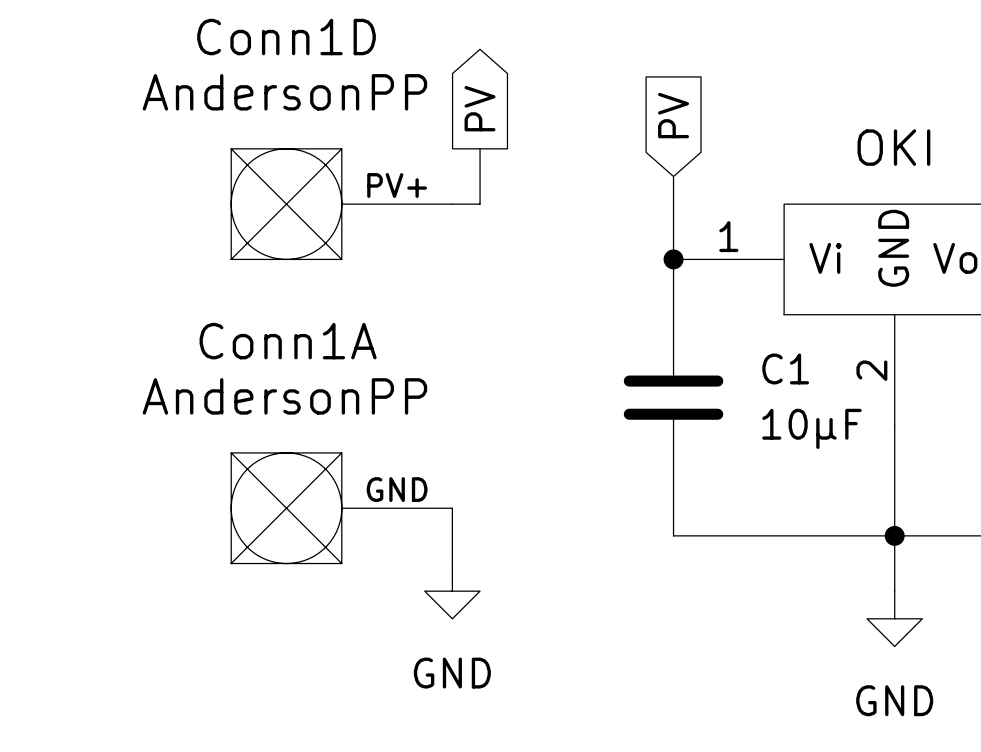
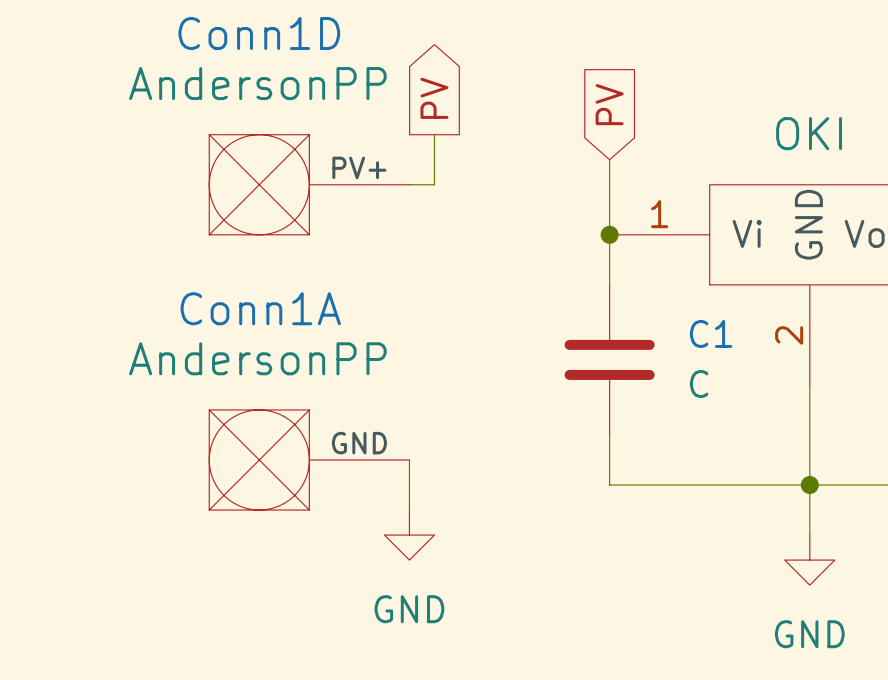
C1 value: 10µF (811, 428) -> C (699, 384)

